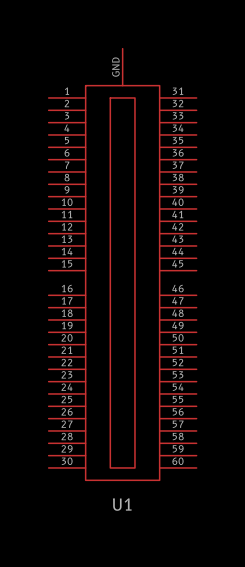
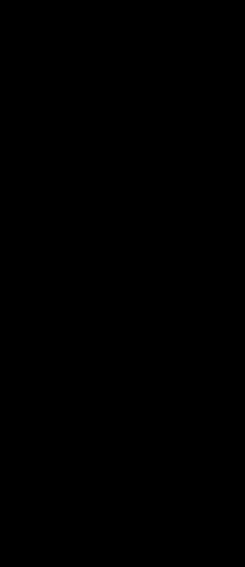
U1: (122, 264) -> none

